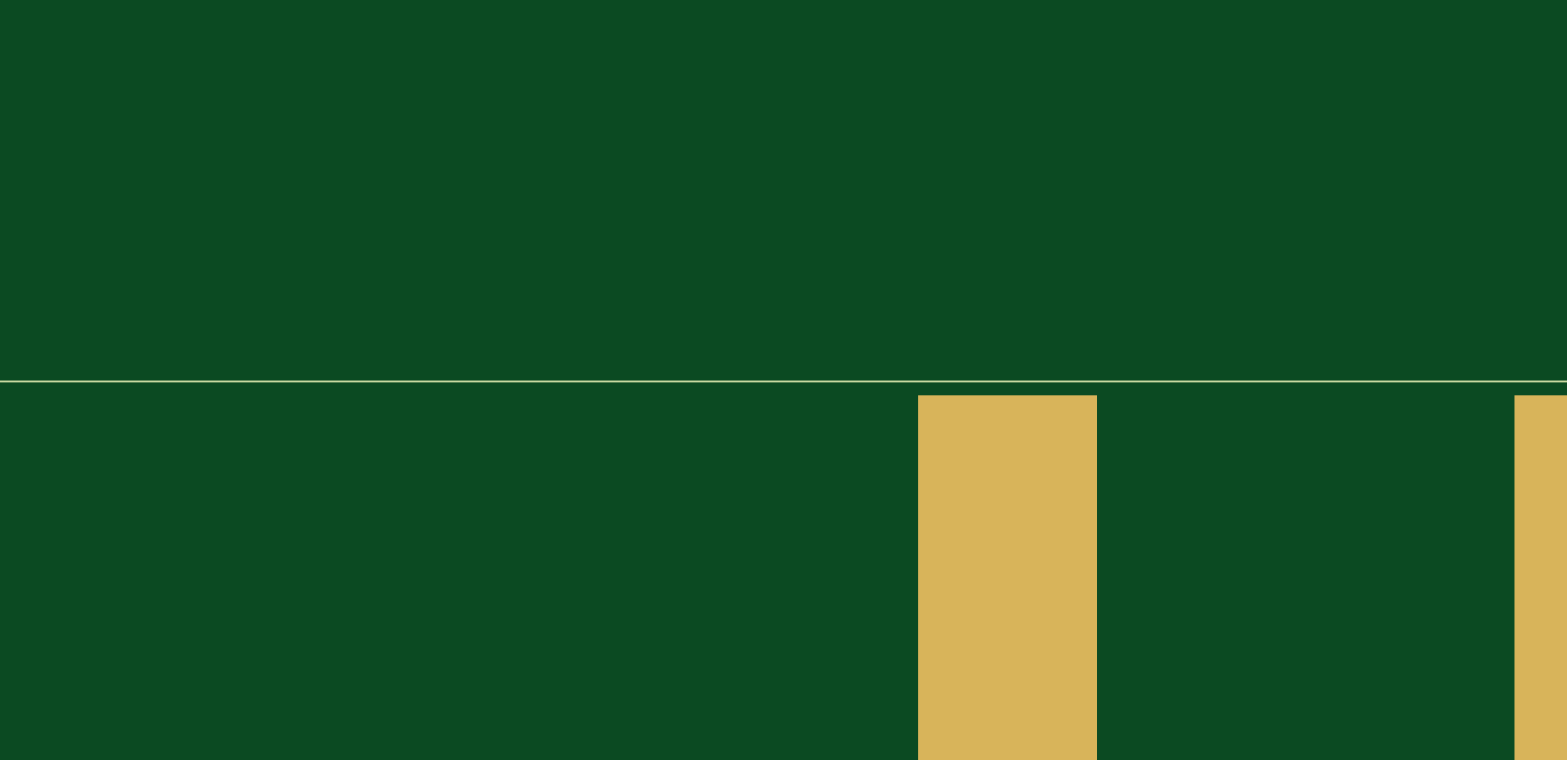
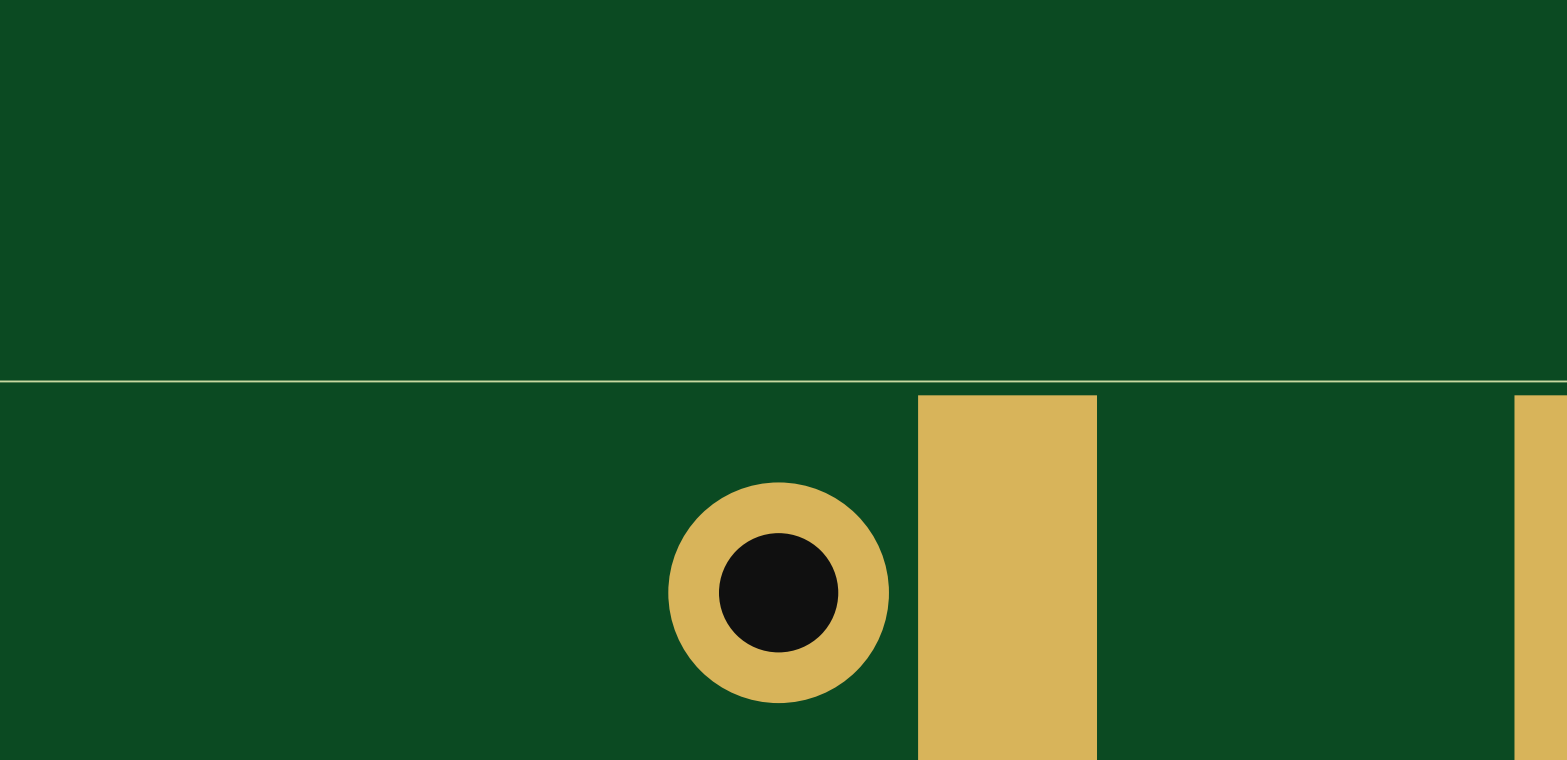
part: none -> (778, 592)

